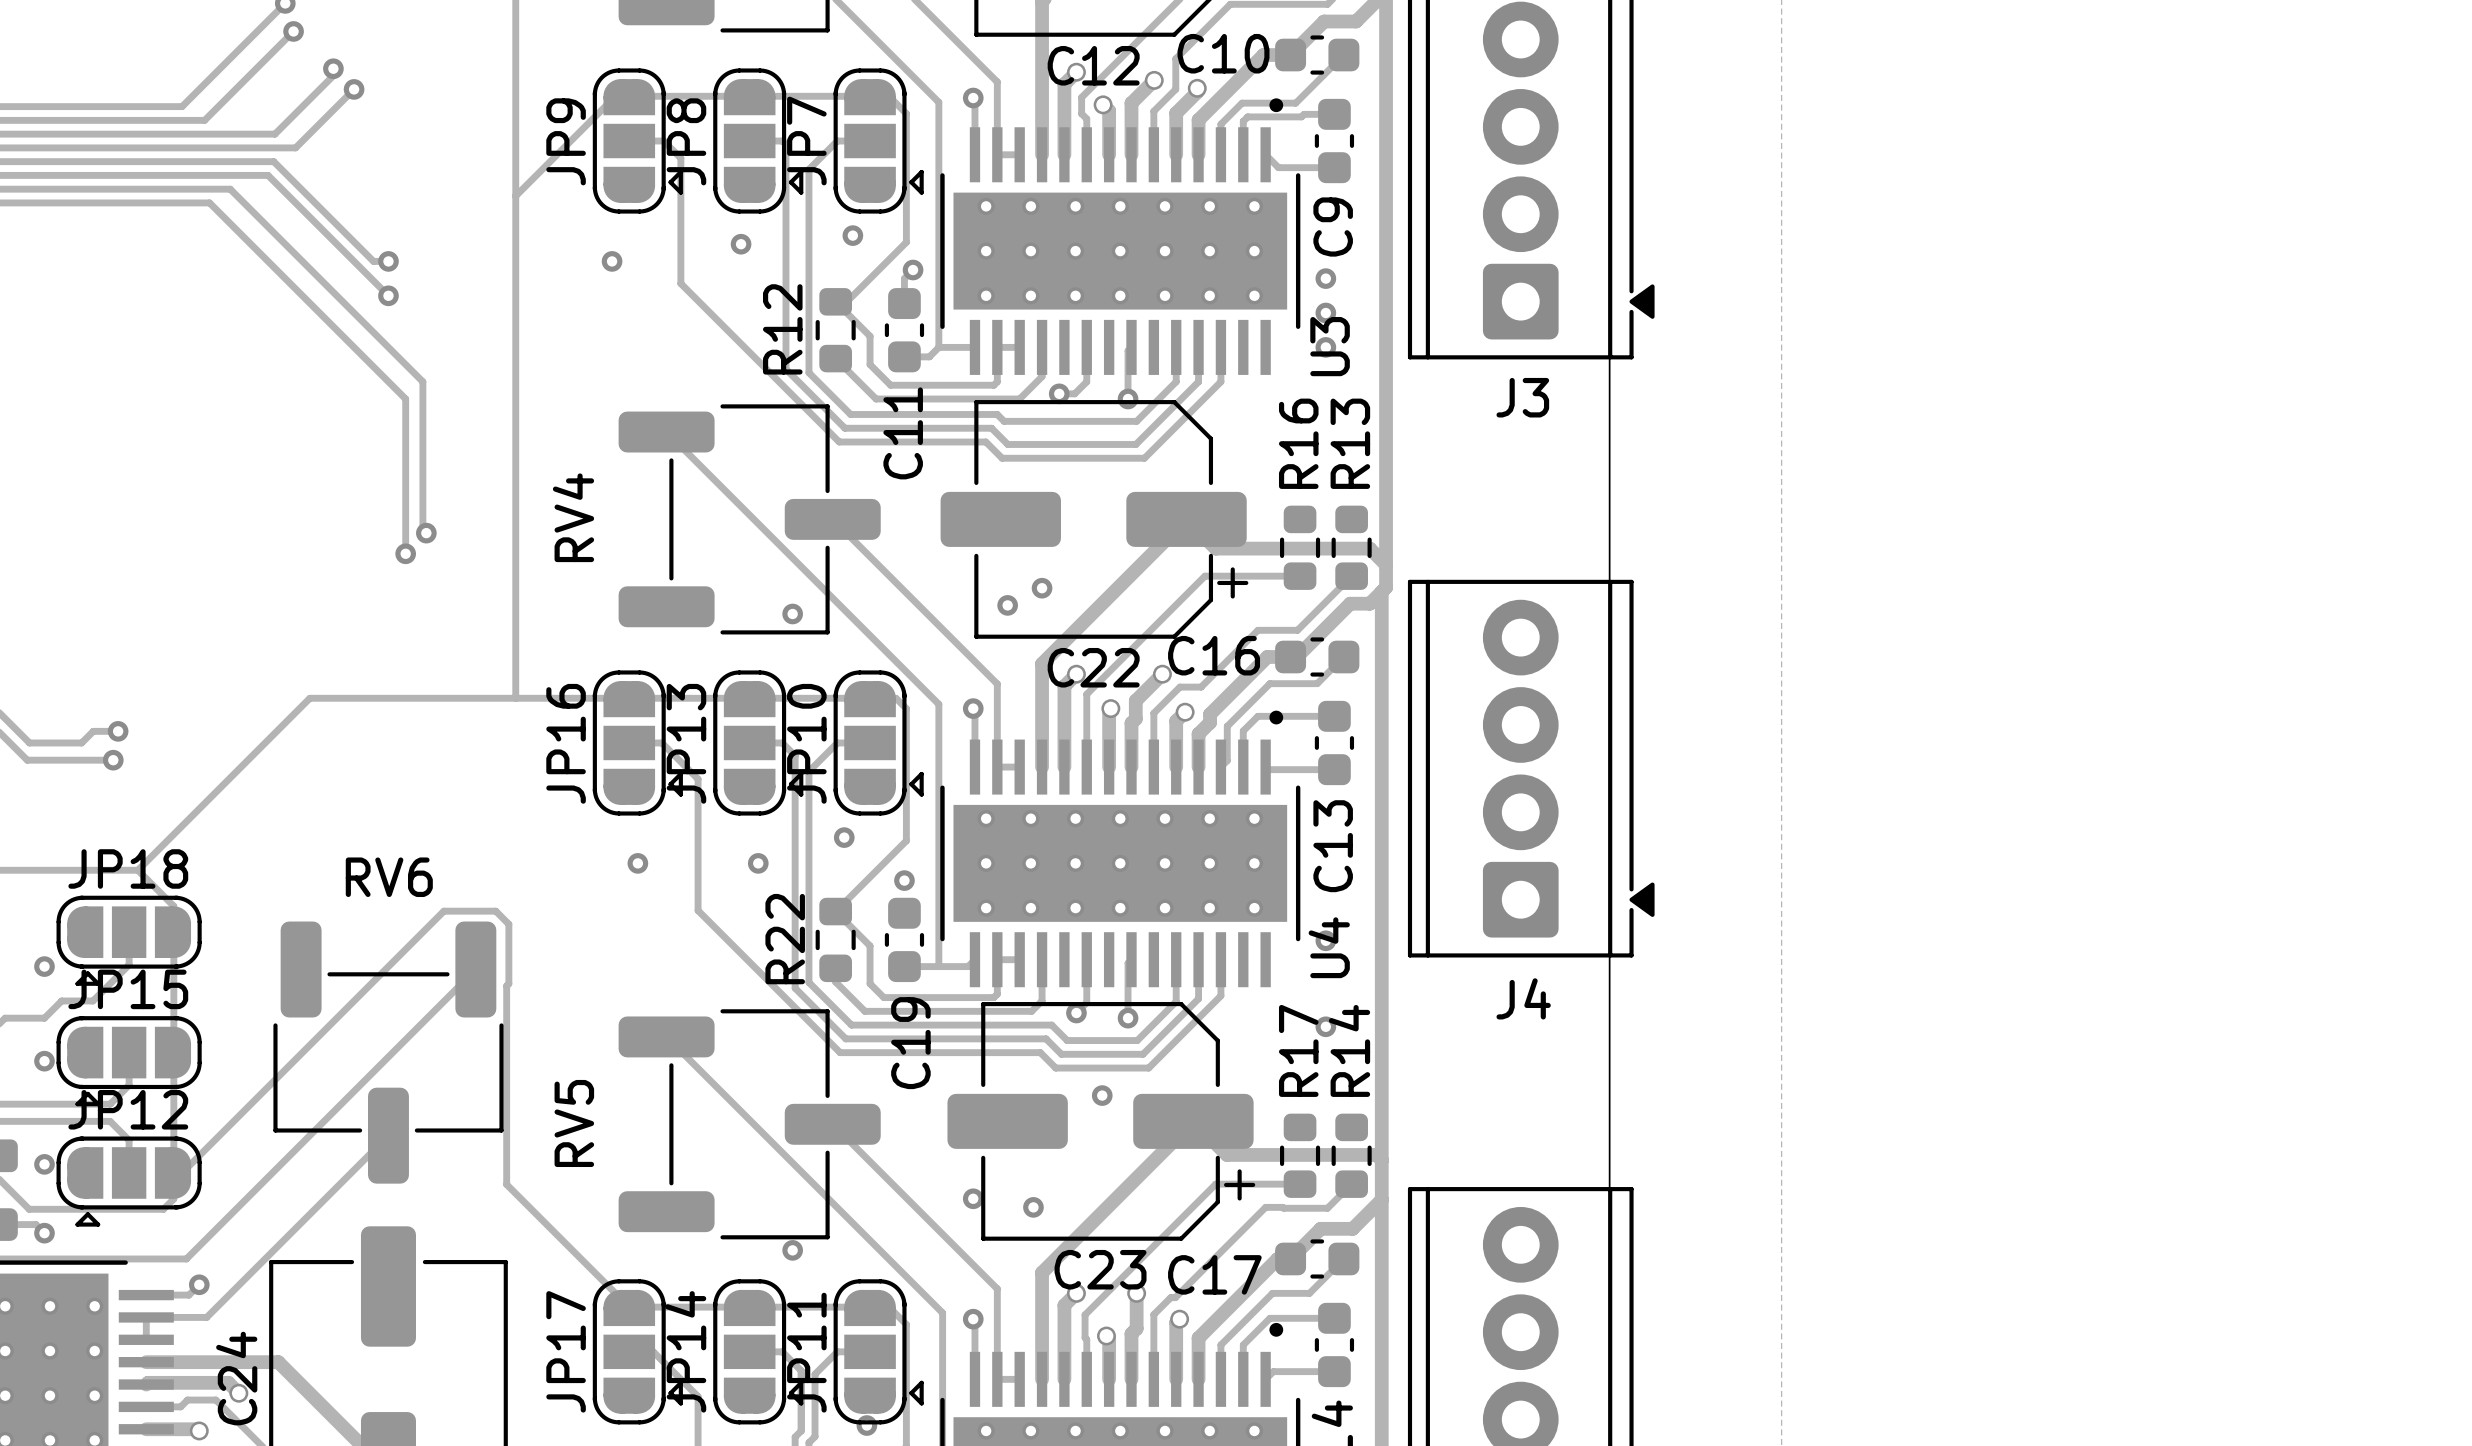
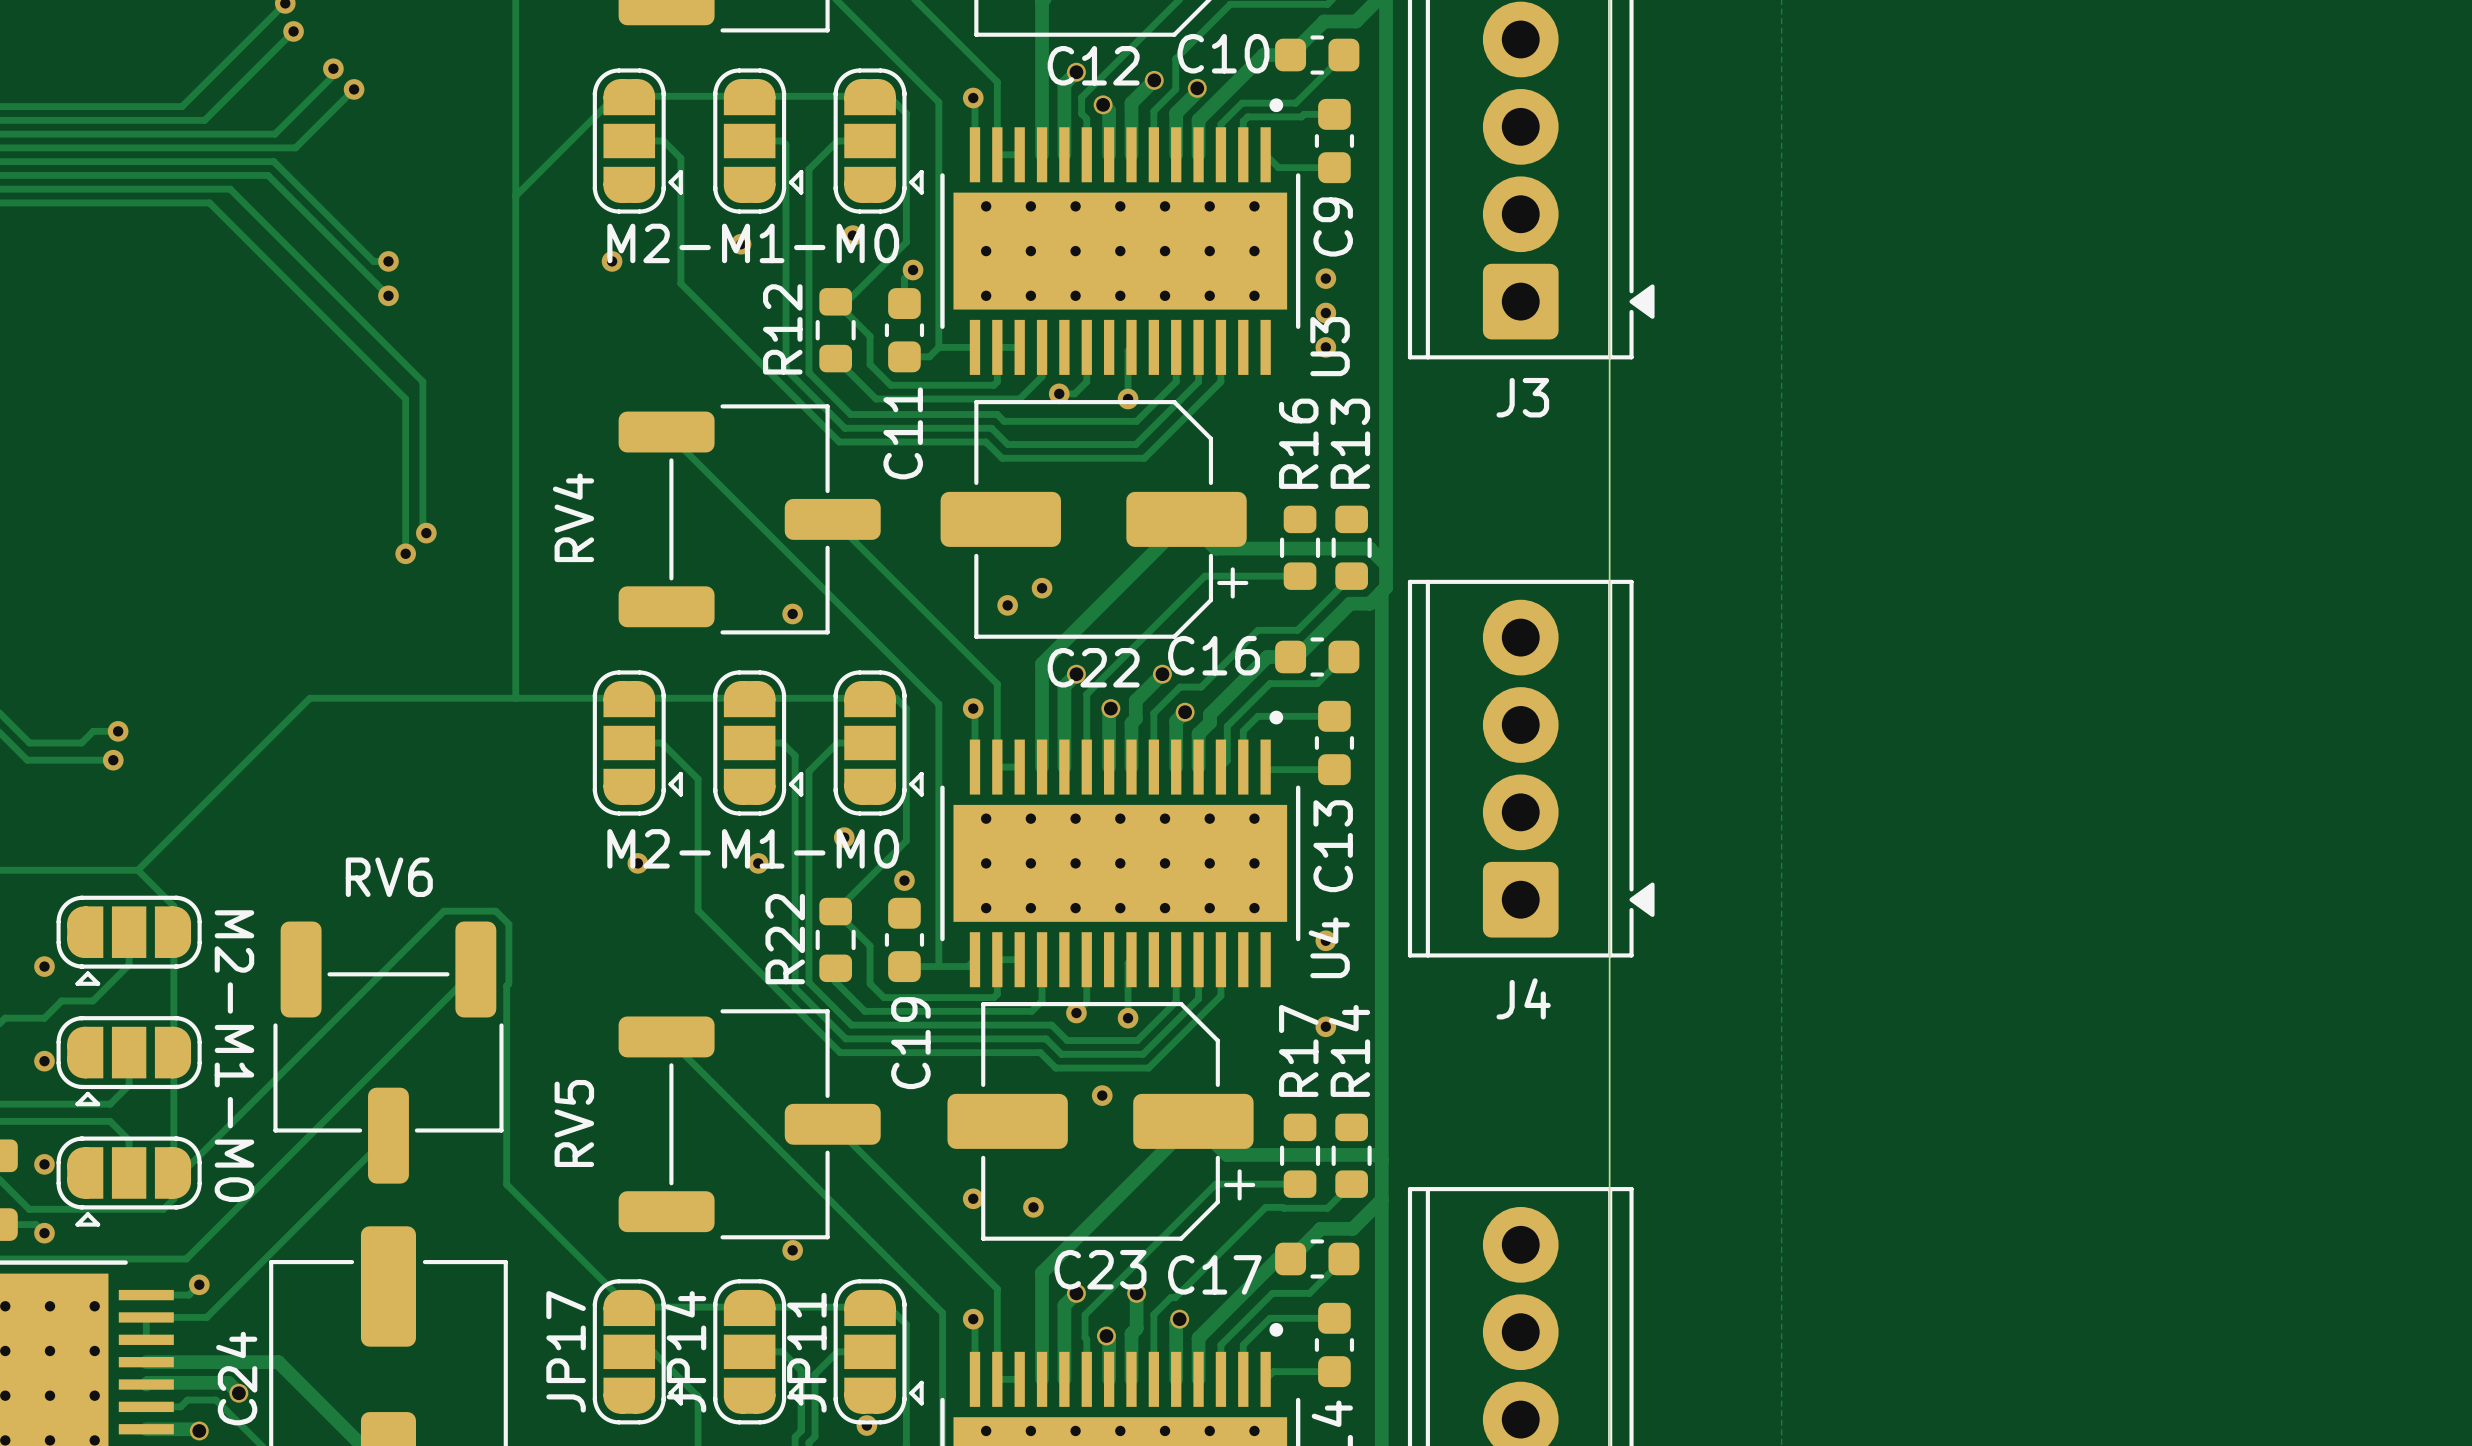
JP9 name: JP9 (566, 141) -> none
JP8 name: JP8 (686, 141) -> none
JP7 name: JP7 (806, 141) -> none
text: none -> M2-M1-M0 (753, 243)
JP16 name: JP16 (566, 743) -> none
JP13 name: JP13 (686, 743) -> none
JP10 name: JP10 (806, 743) -> none
text: none -> M2-M1-M0 (753, 848)
JP18 name: JP18 (128, 868) -> none
JP15 name: JP15 (128, 989) -> none
text: none -> M2-M1-M0 (234, 1056)
JP12 name: JP12 (128, 1109) -> none

